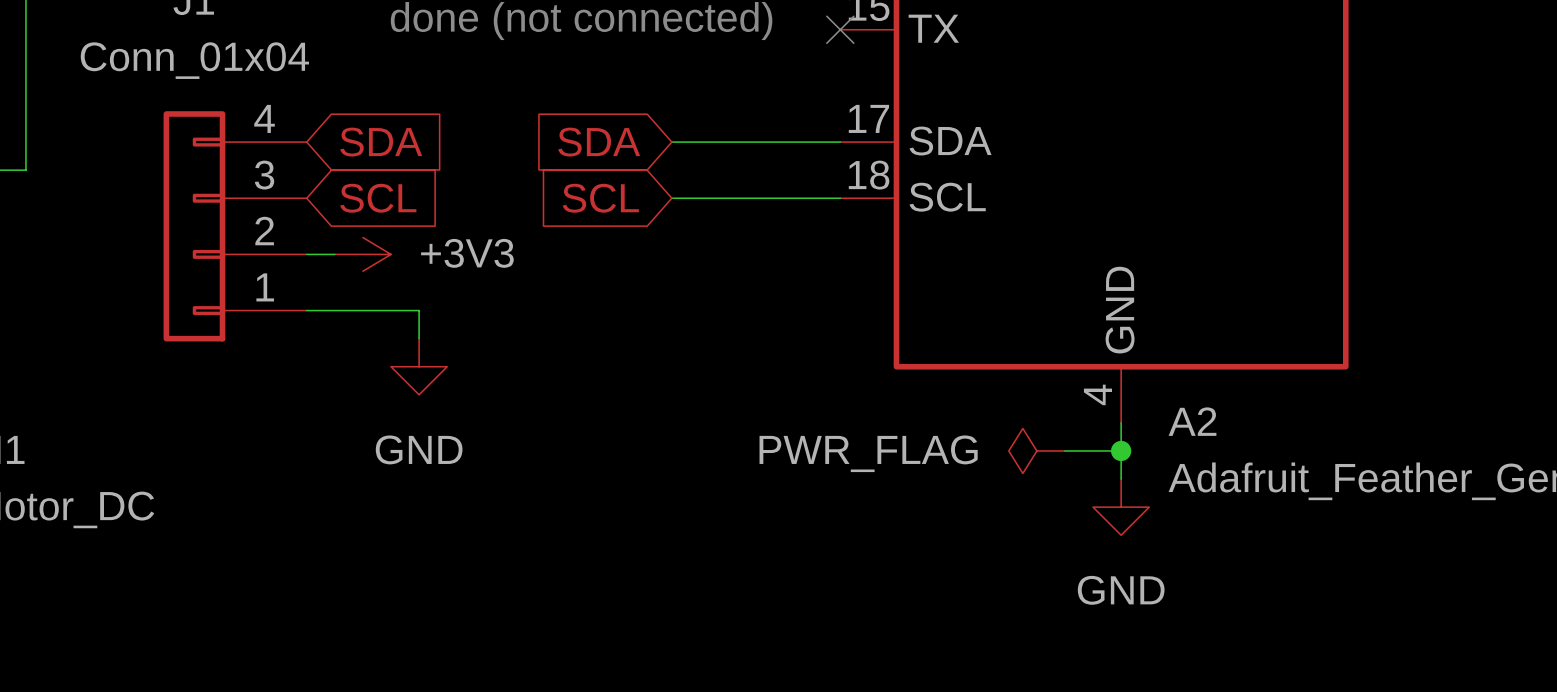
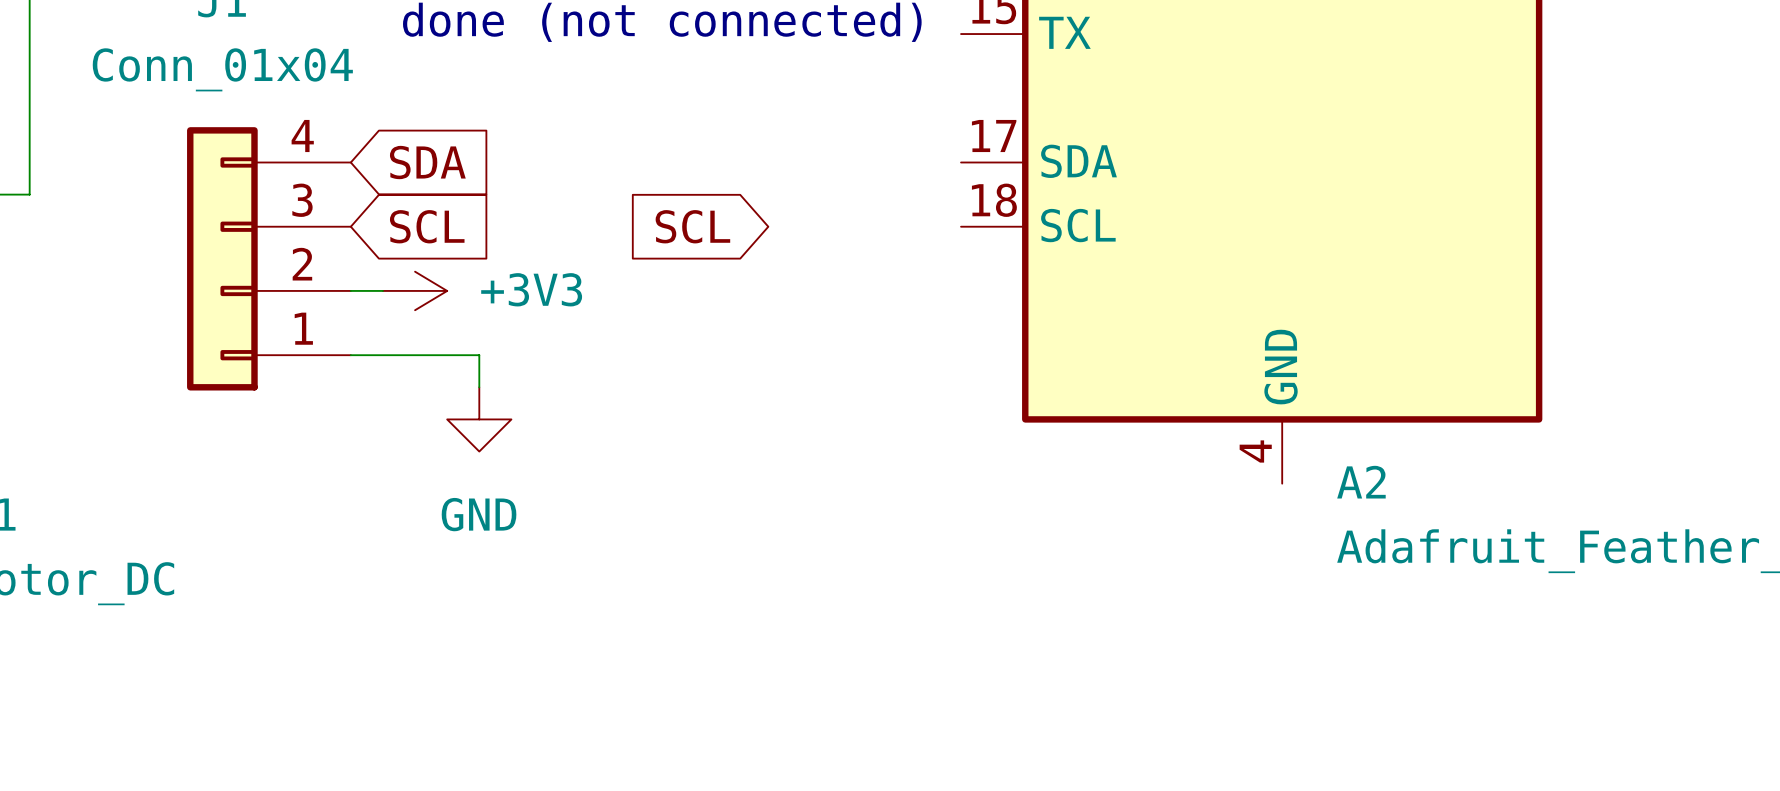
no-connect mark: (840, 29) -> none
global label: SDA (599, 142) -> none
wire: (671, 142) (840, 142) -> none
wire: (671, 198) (840, 198) -> none
wire: (1121, 422) (1121, 479) -> none
power symbol: PWR_FLAG (1036, 450) -> none
wire: (1064, 450) (1121, 450) -> none
junction: (1121, 450) -> none
power symbol: GND (1121, 507) -> none

